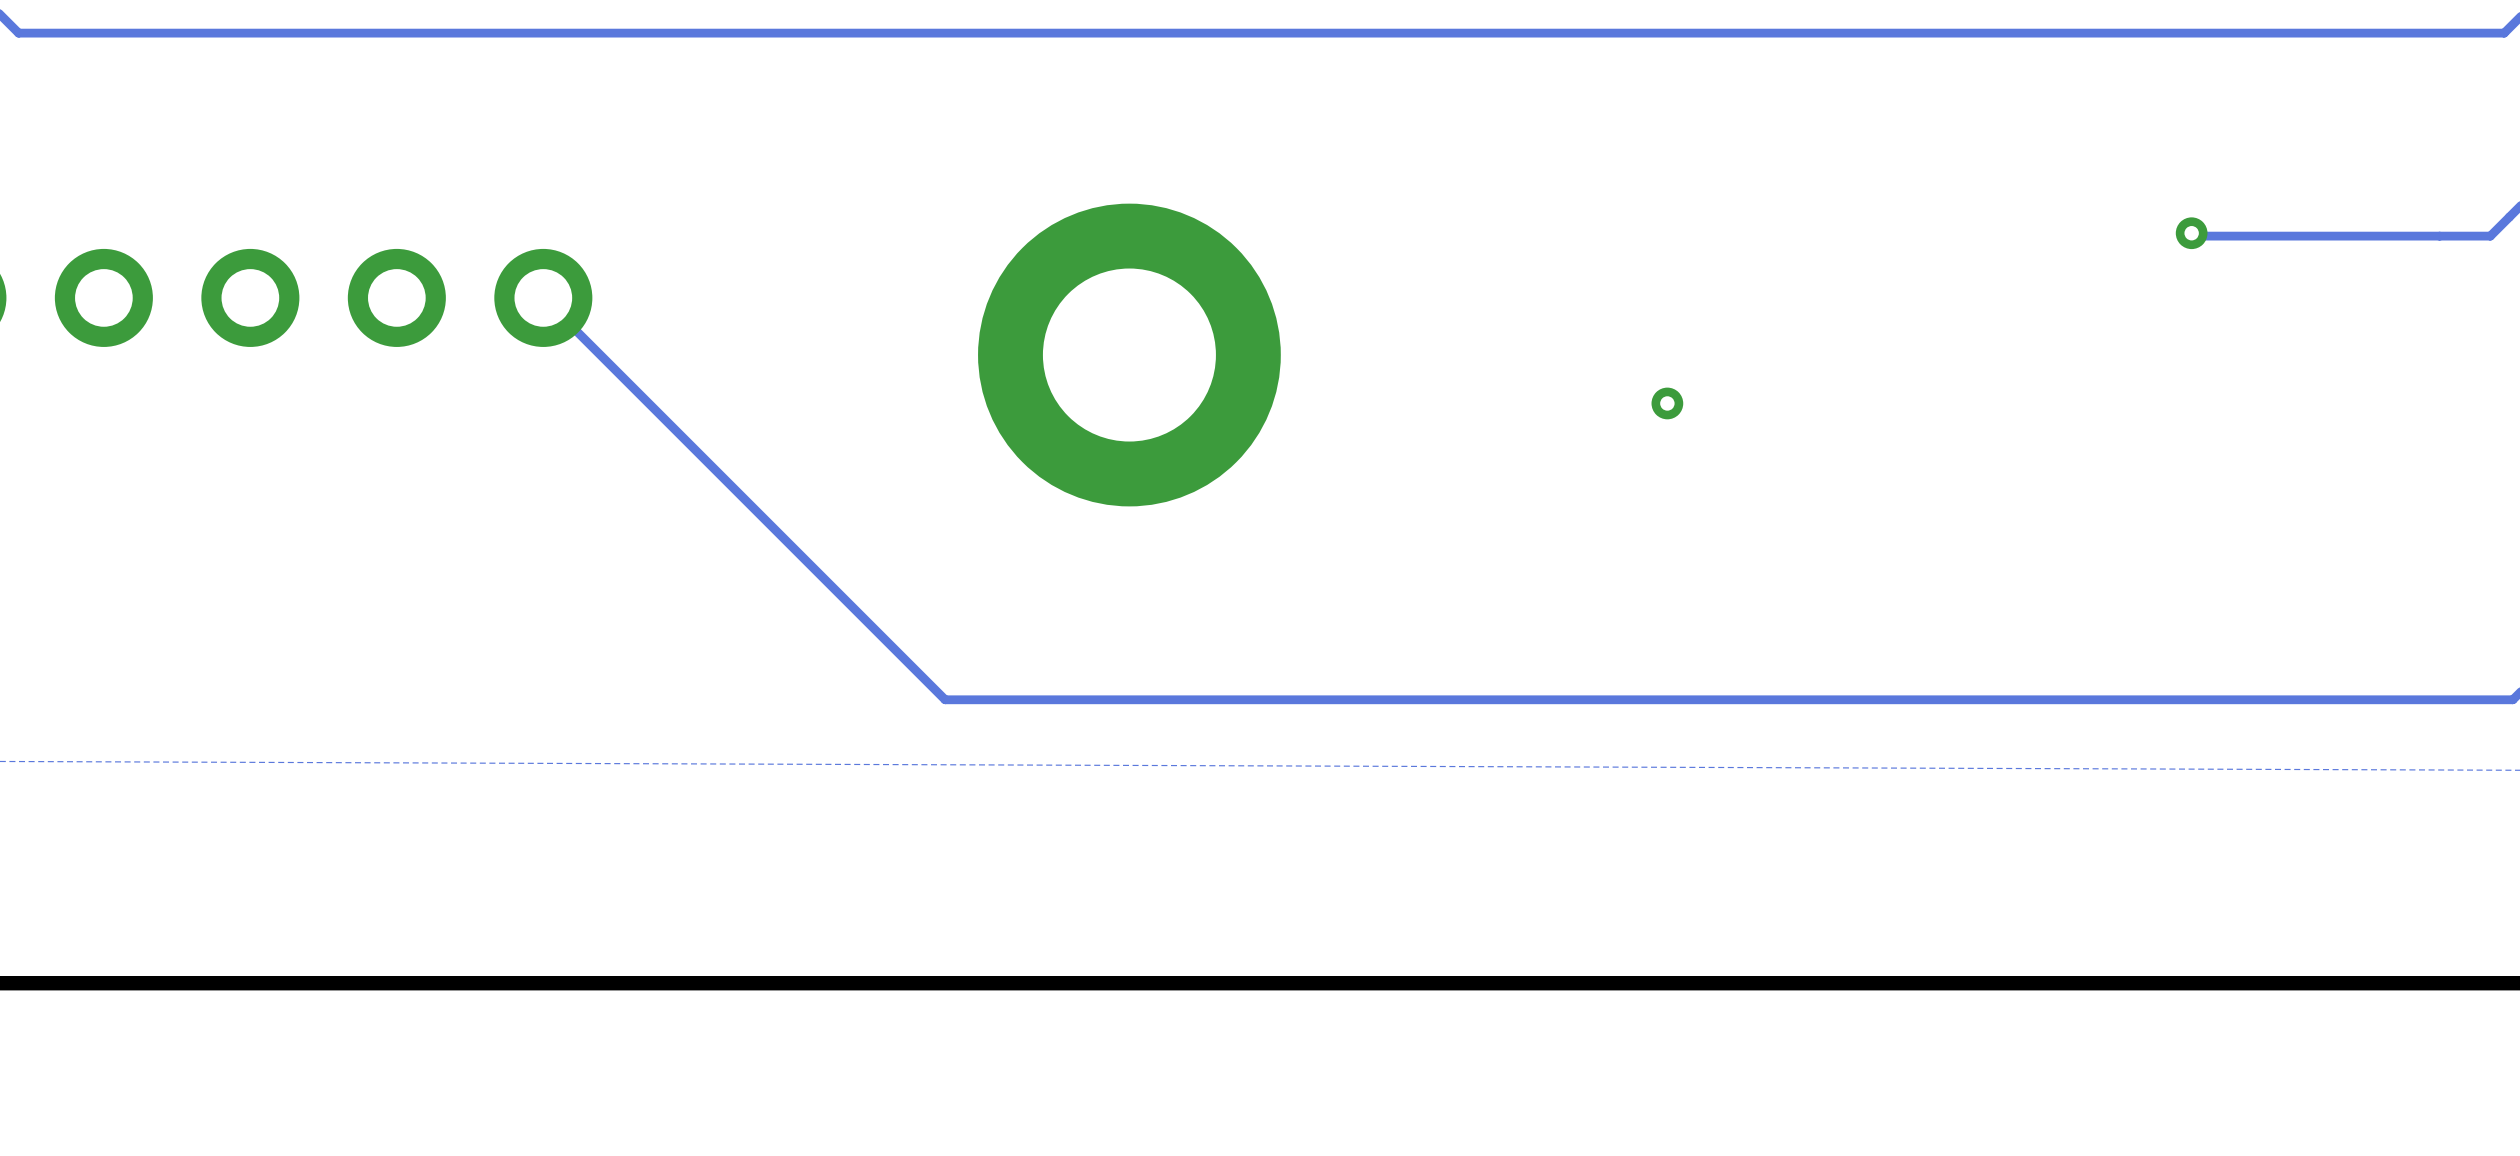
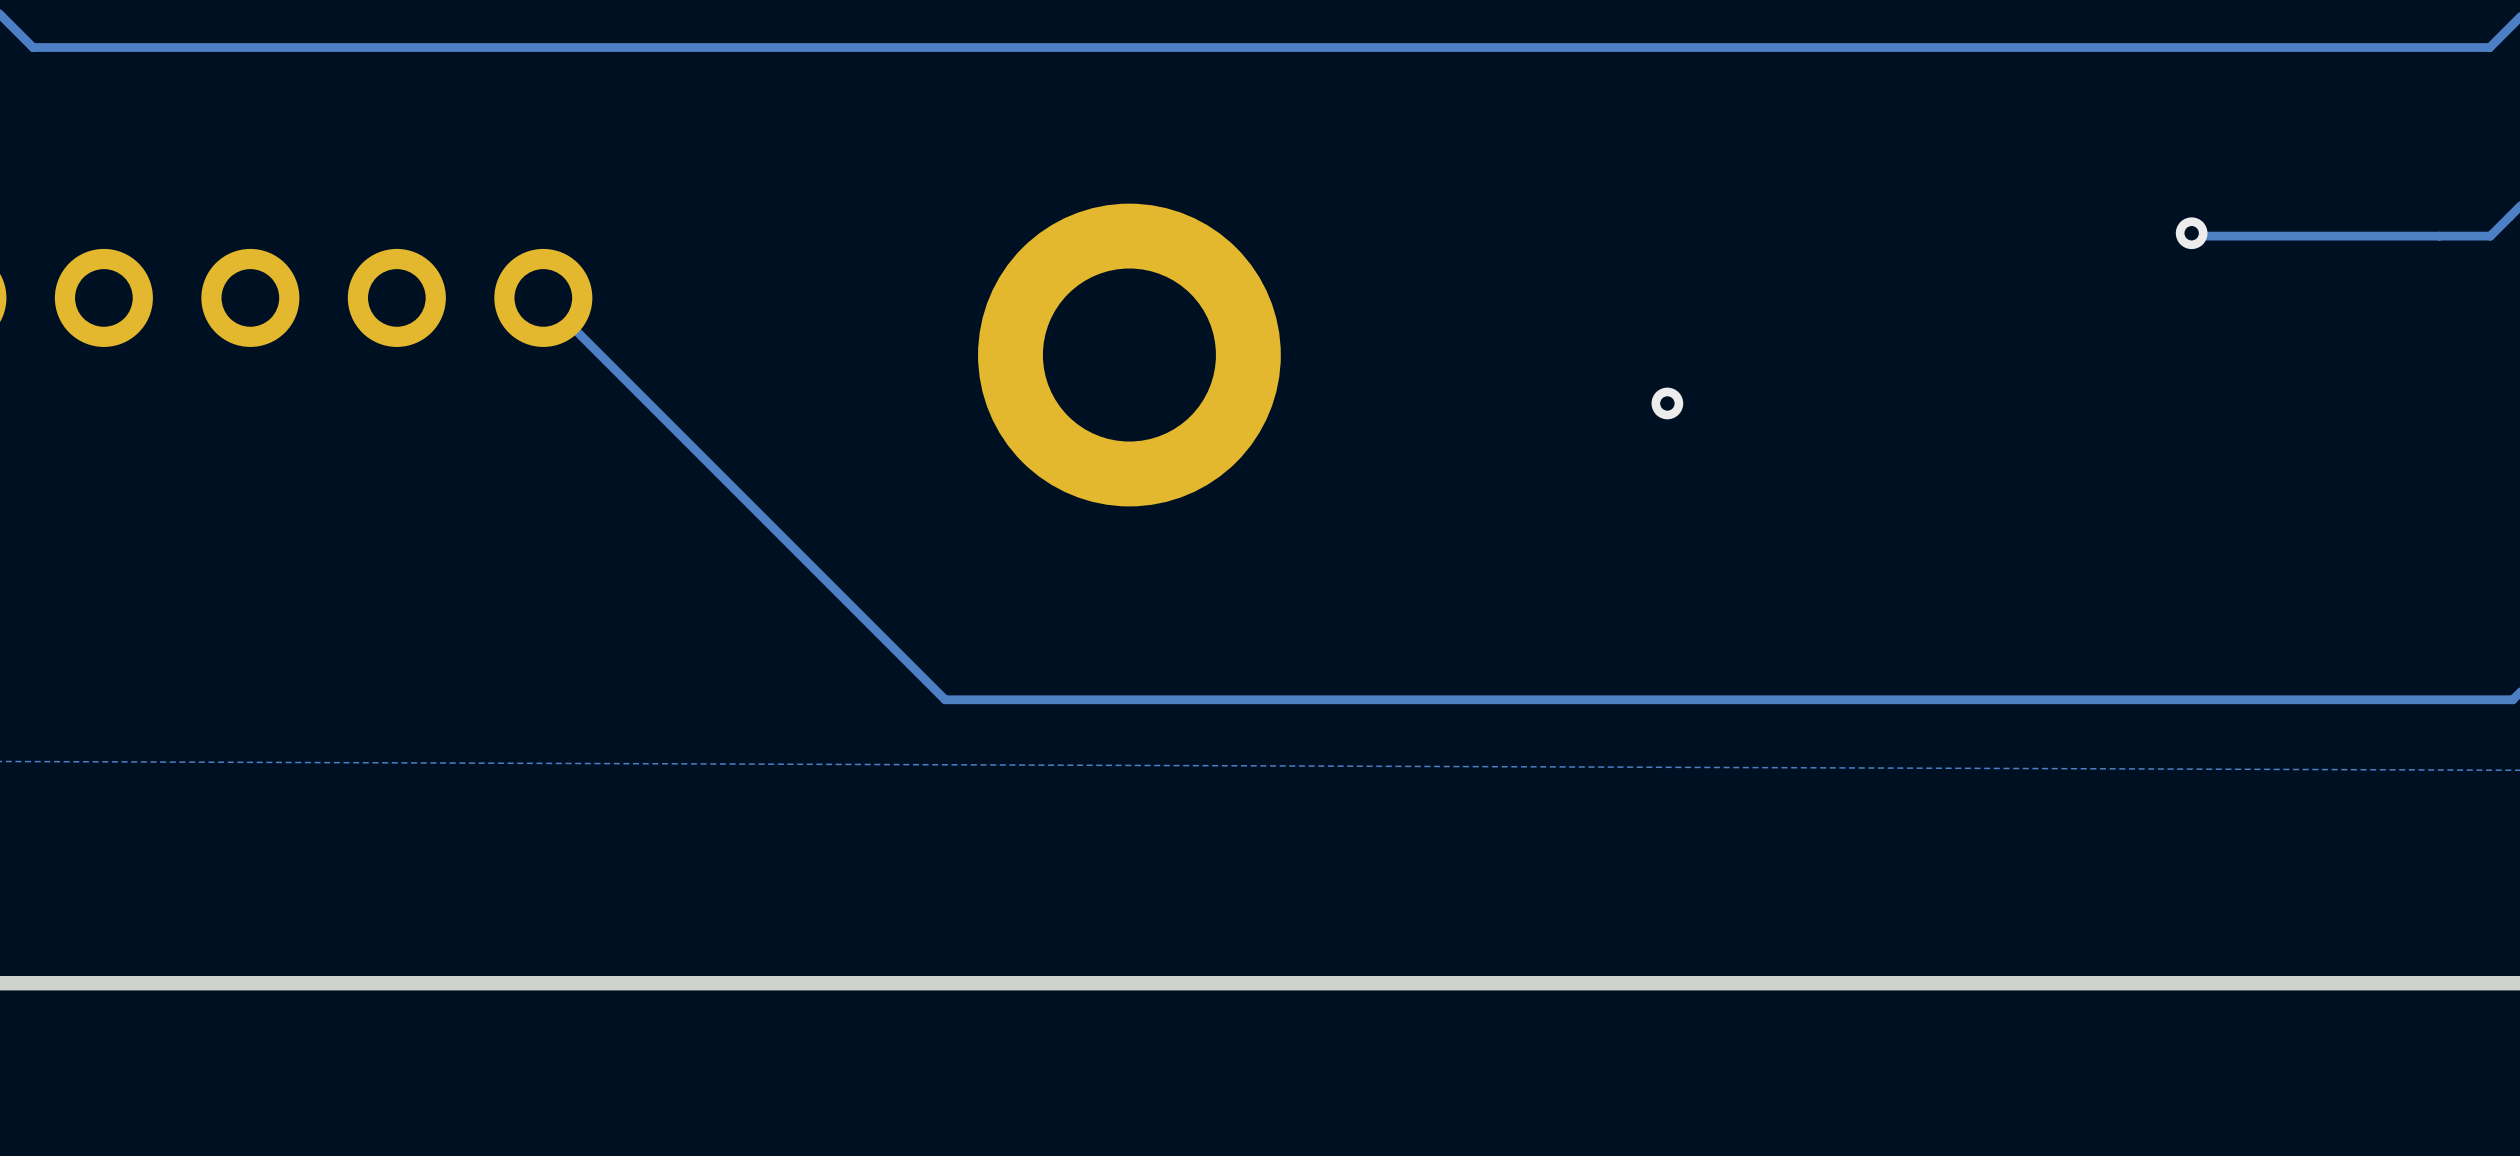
track: (2504, 33) (18, 33) -> (2504, 33) (2489, 47) (33, 47) (18, 33)

